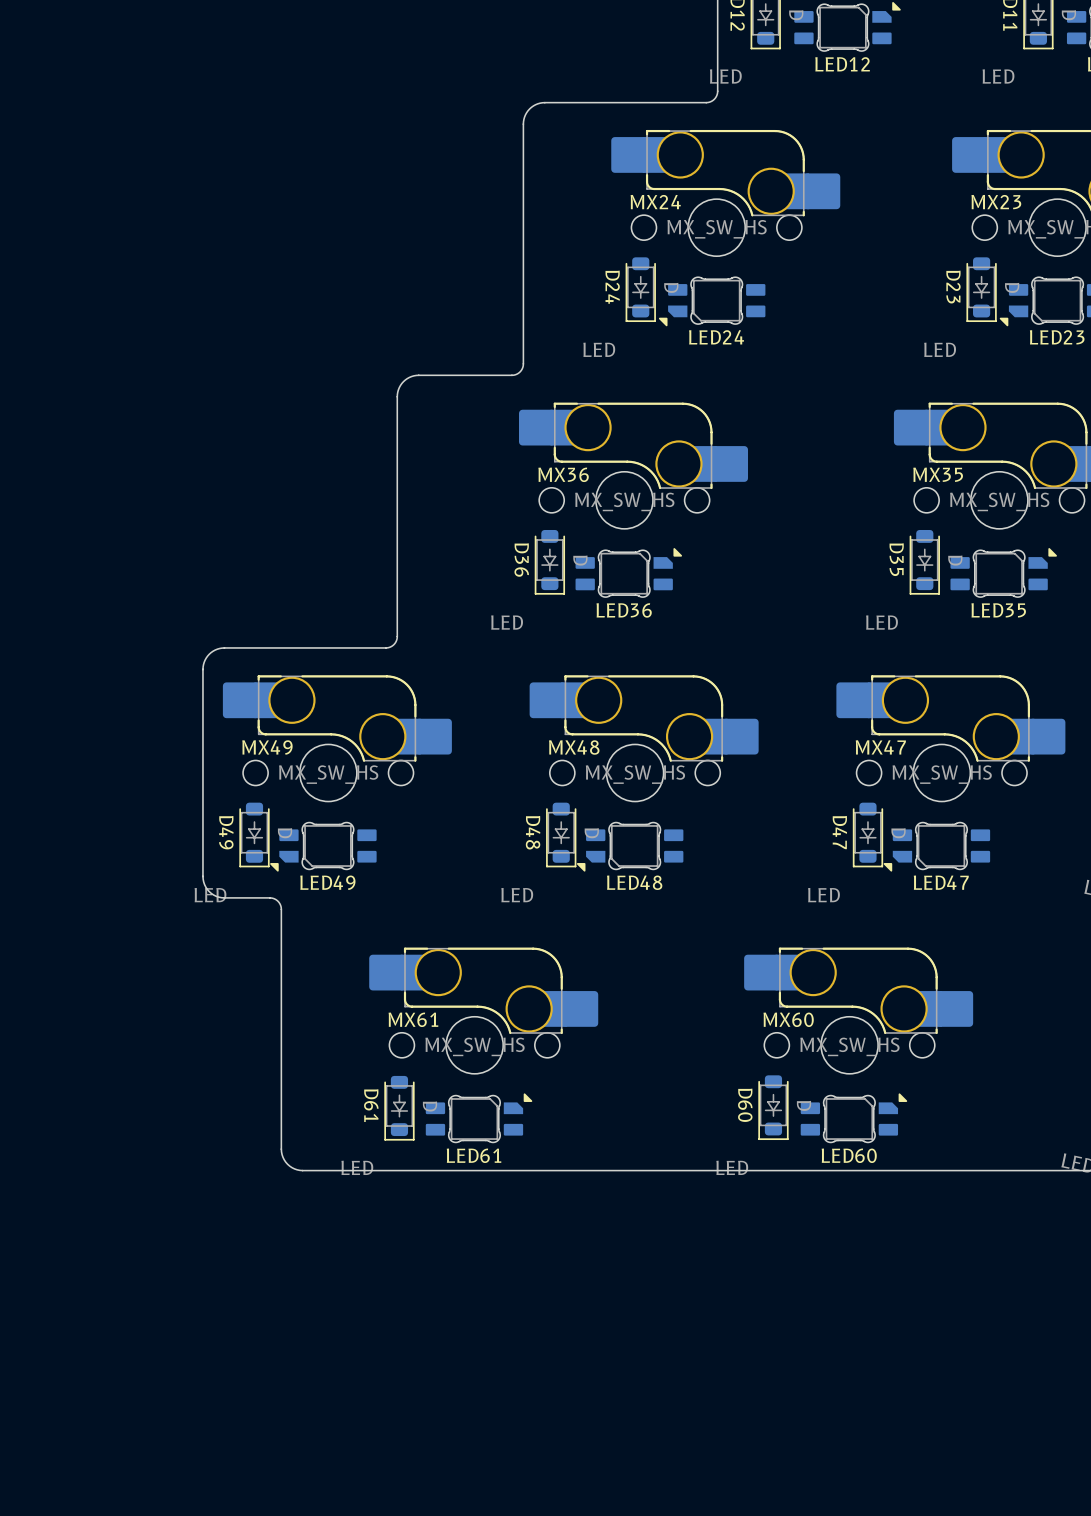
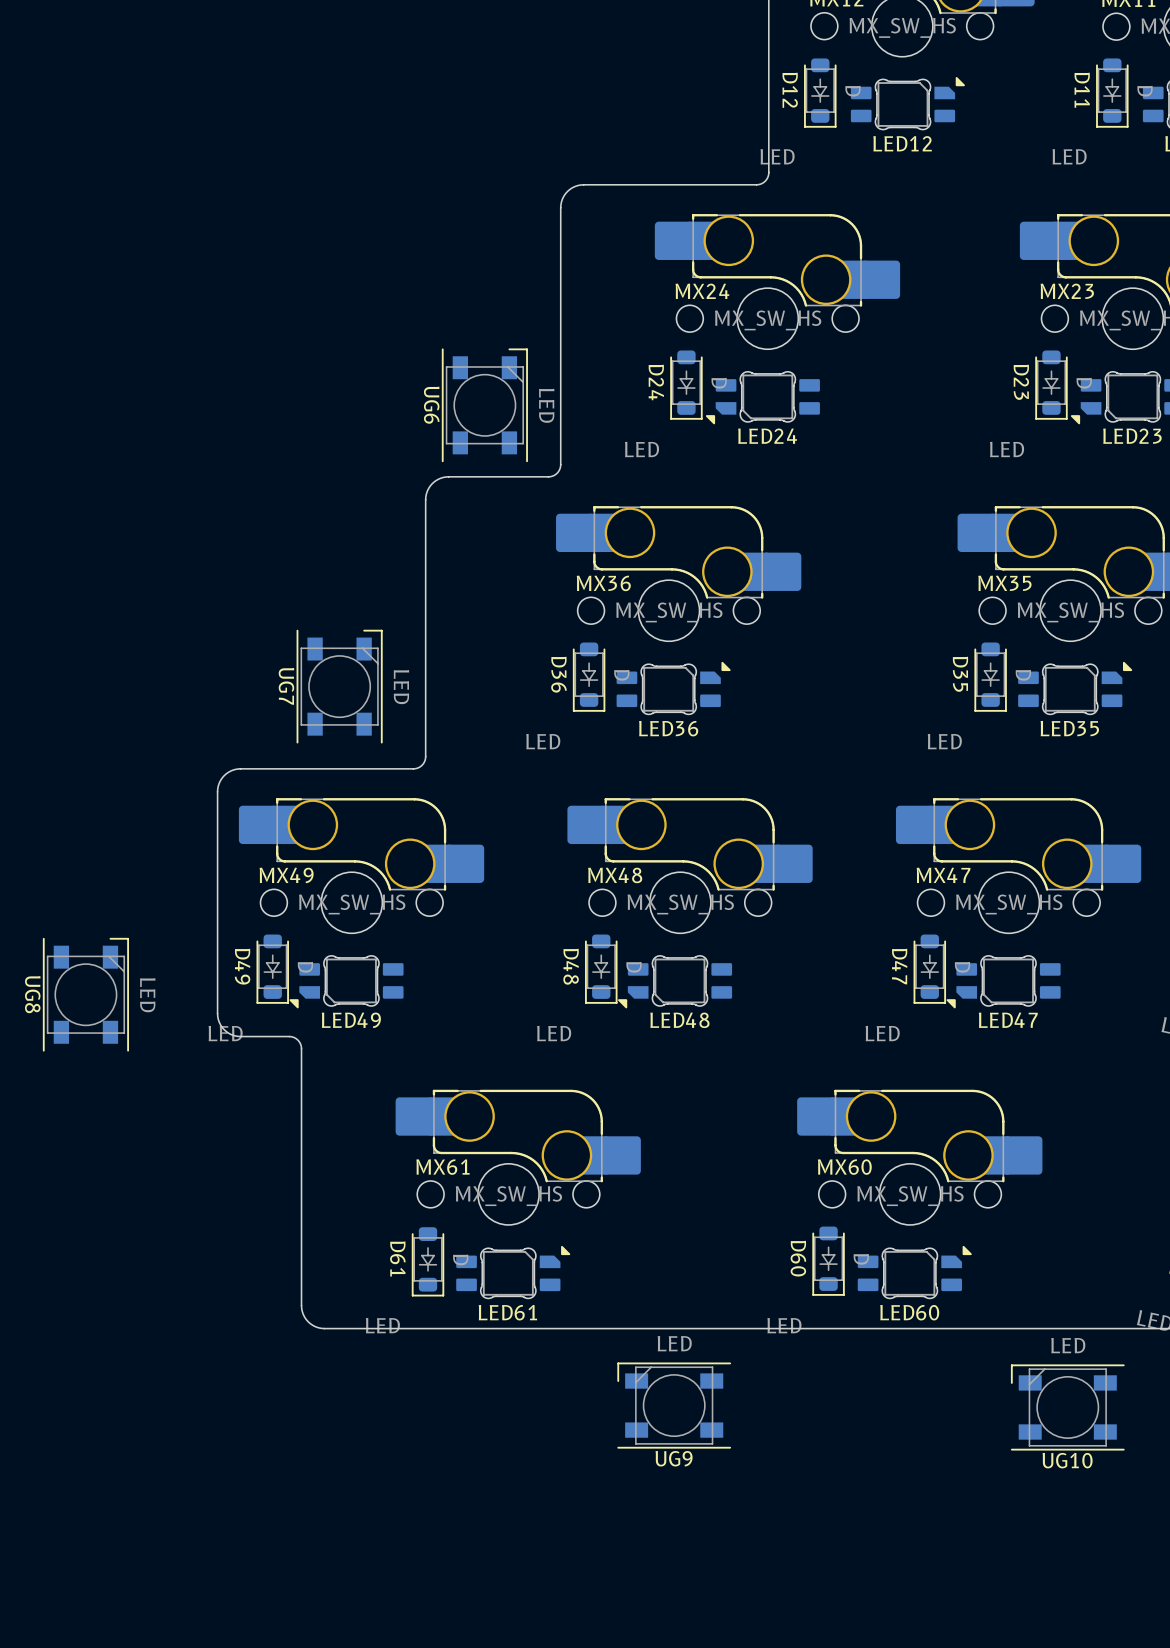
UG6: none -> LED (484, 405)
UG7: none -> LED (339, 686)
UG8: none -> LED (85, 994)
UG9: none -> LED (674, 1405)
UG10: none -> LED (1067, 1407)

